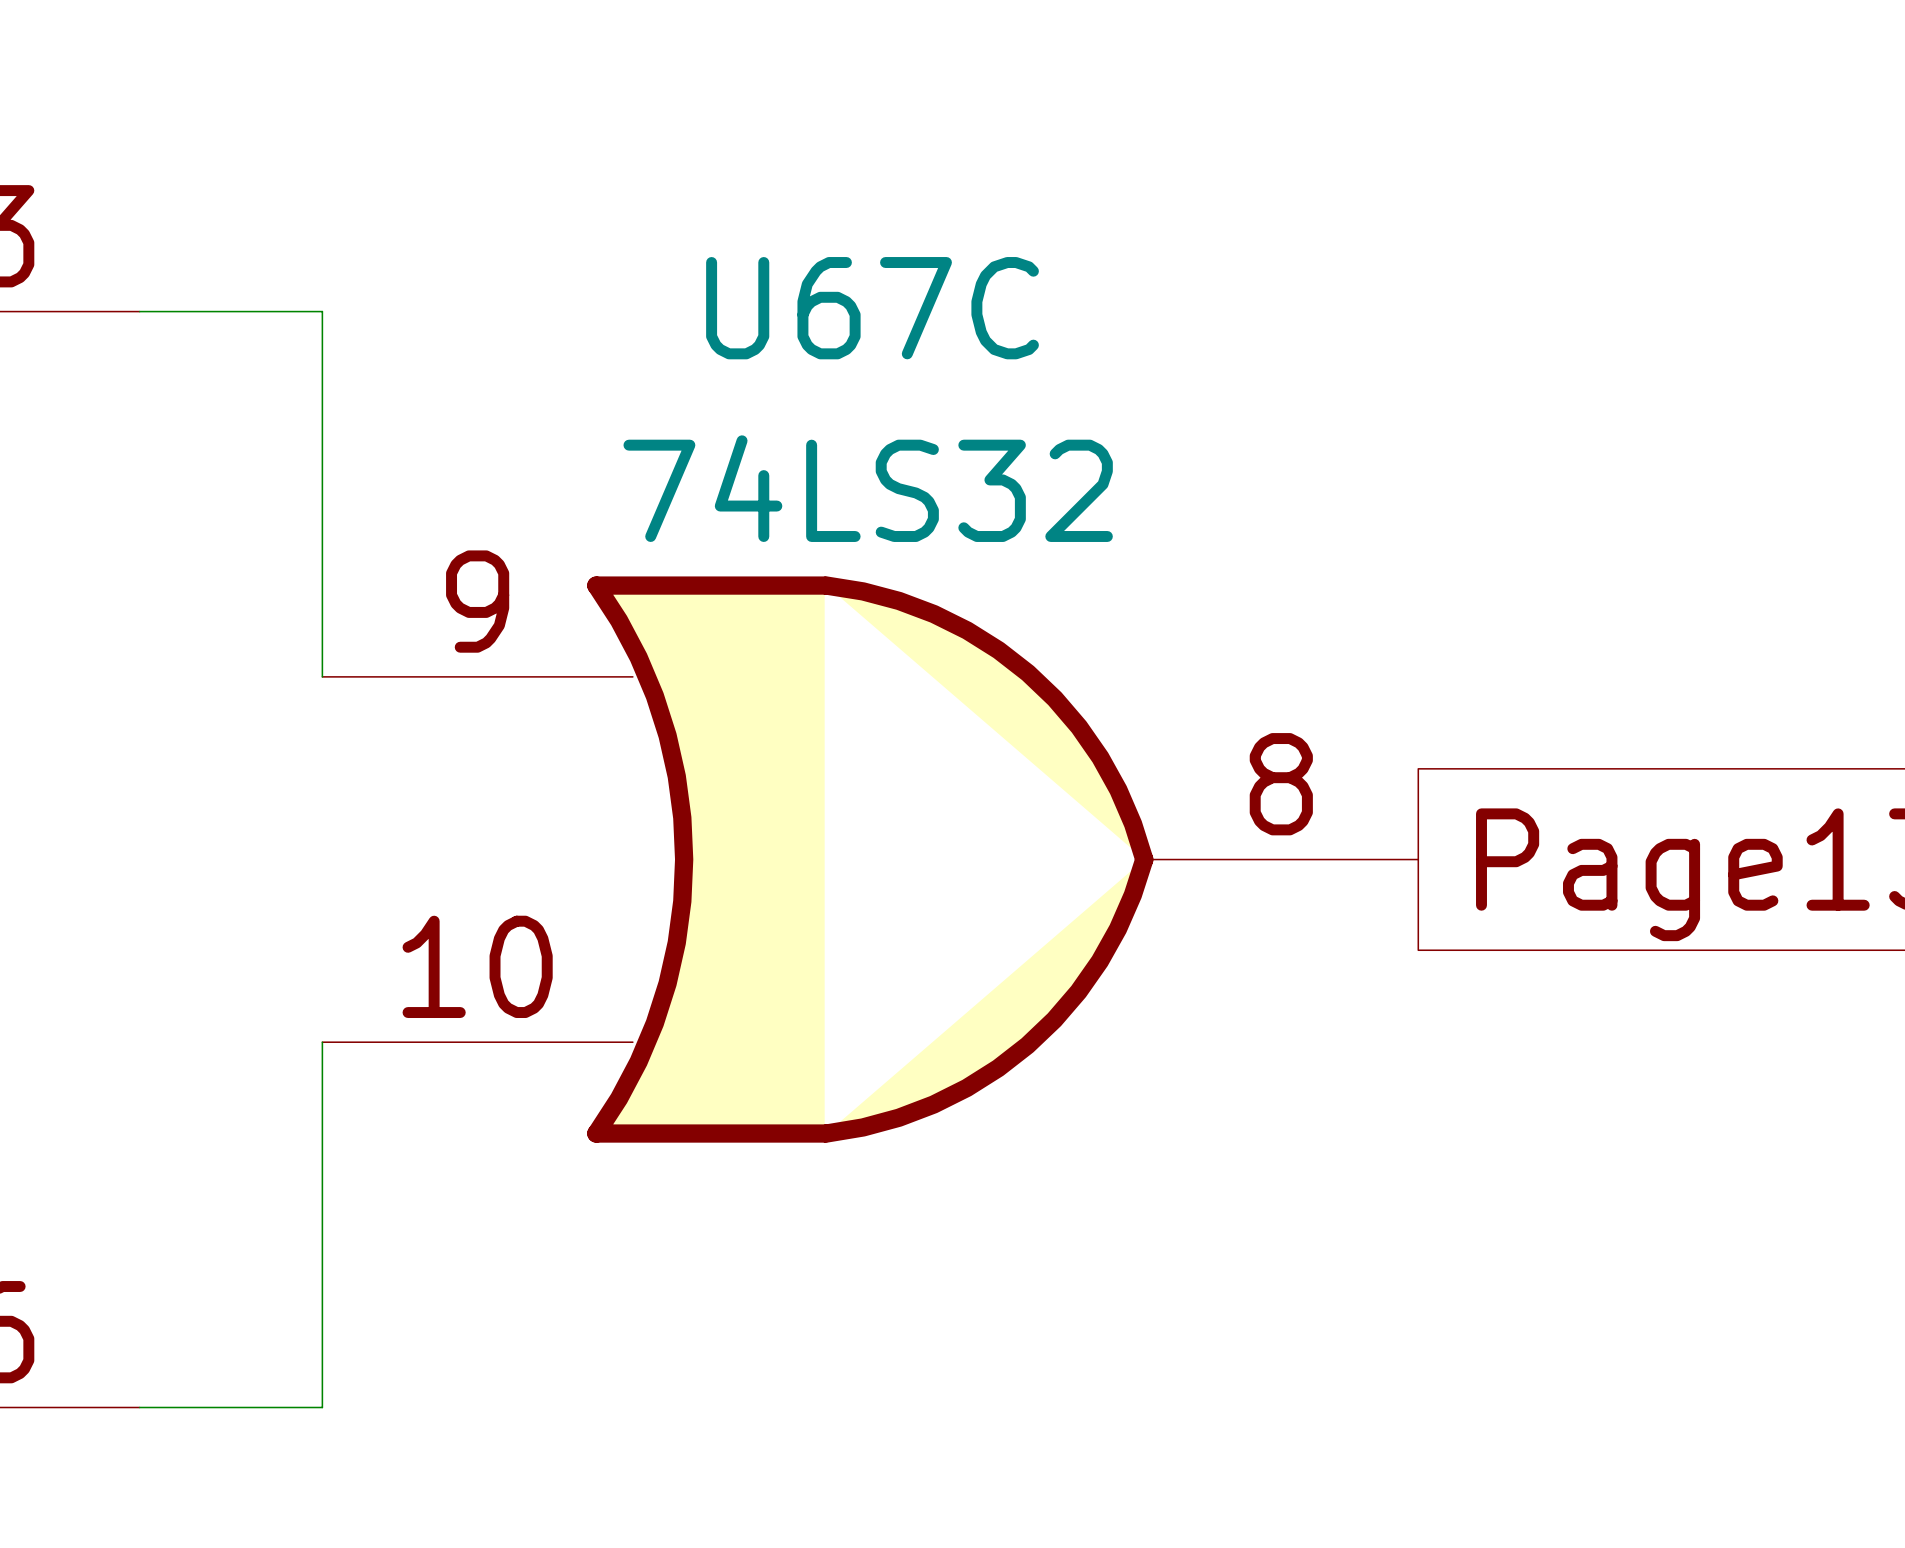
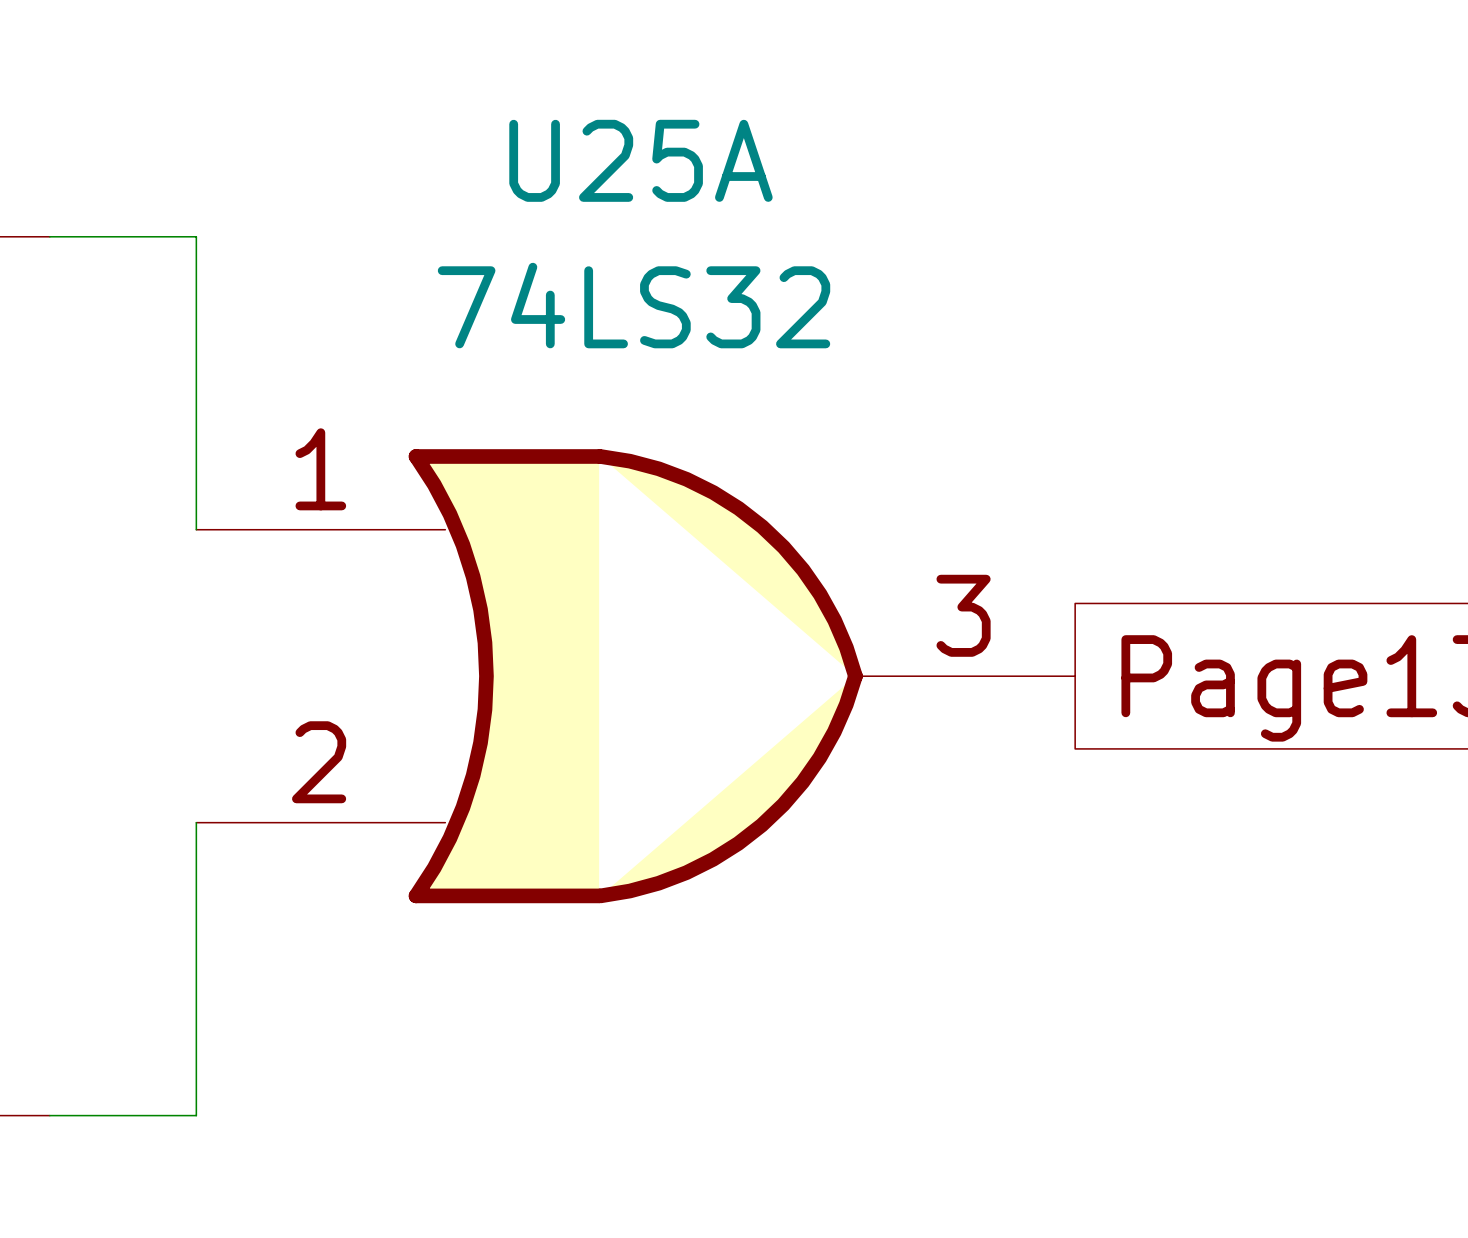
U67C name: U67C (872, 308) -> U25A (640, 160)
U67C value position: 74LS32 (868, 488) -> 74LS32 (634, 305)
U67C pin number: 9 (477, 601) -> 1 (320, 469)
U67C pin number: 8 (1281, 784) -> 3 (963, 615)
U67C pin number: 10 (477, 966) -> 2 (319, 762)

